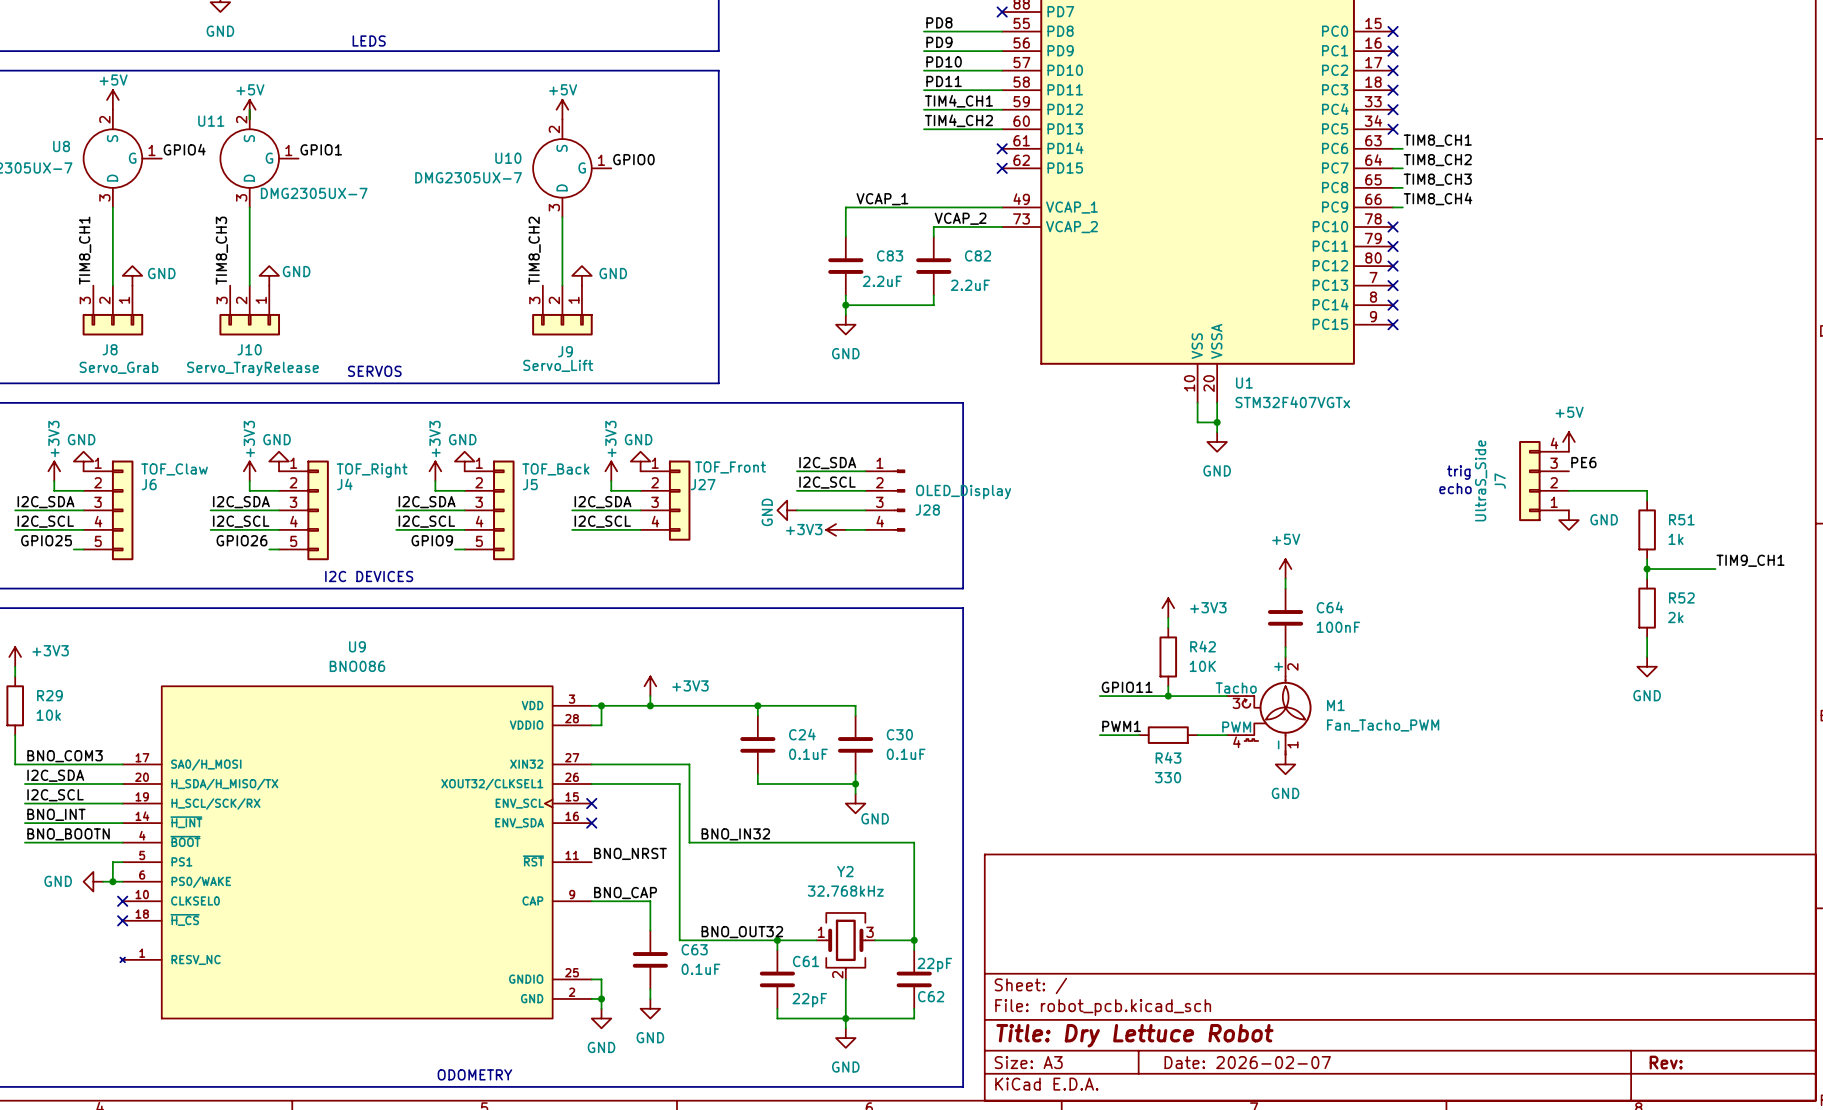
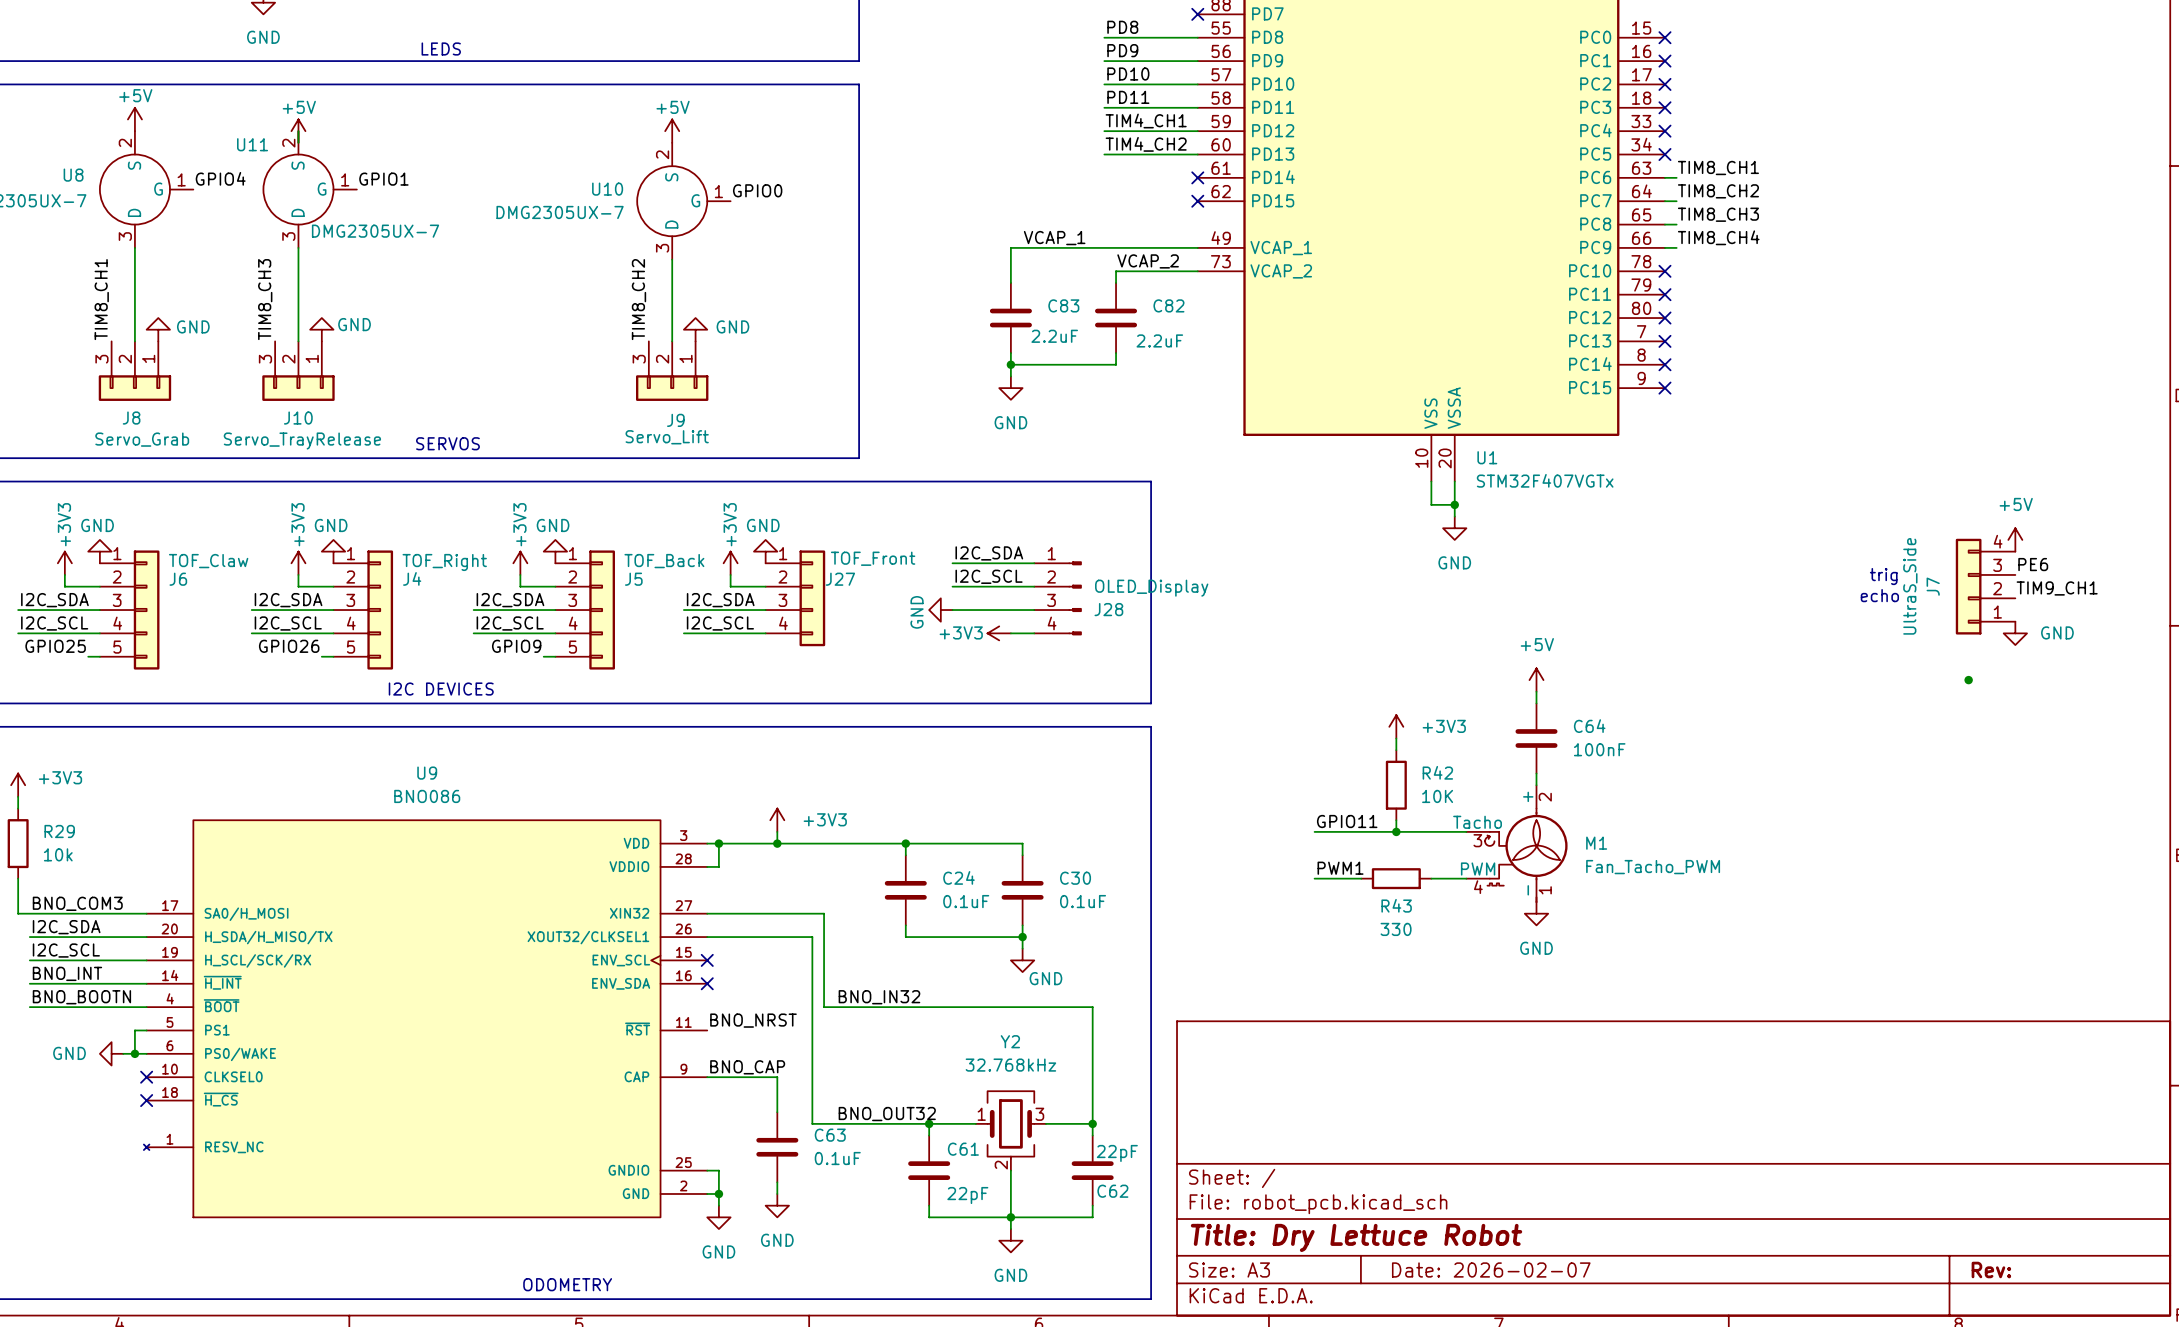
power symbol position: +5V (1568, 441) -> +5V (2015, 539)
label position: PE6 (1583, 462) -> PE6 (2033, 564)
text position: trig (1458, 472) -> trig (1883, 576)
J7 position: (1544, 481) -> (1985, 586)
text position: echo (1455, 488) -> echo (1879, 595)
wire: (1568, 490) (1647, 490) (1647, 500) -> none
power symbol: GND (1568, 520) -> none
R51: 1k (1647, 529) -> none
power symbol: none -> GND (2015, 633)
wire: (1647, 559) (1647, 578) -> none
label position: TIM9_CH1 (1750, 560) -> TIM9_CH1 (2057, 588)
wire: (1647, 569) (1715, 569) -> none
R52: 2k (1647, 608) -> none
wire: (1647, 637) (1647, 656) -> none
power symbol: GND (1647, 666) -> none

